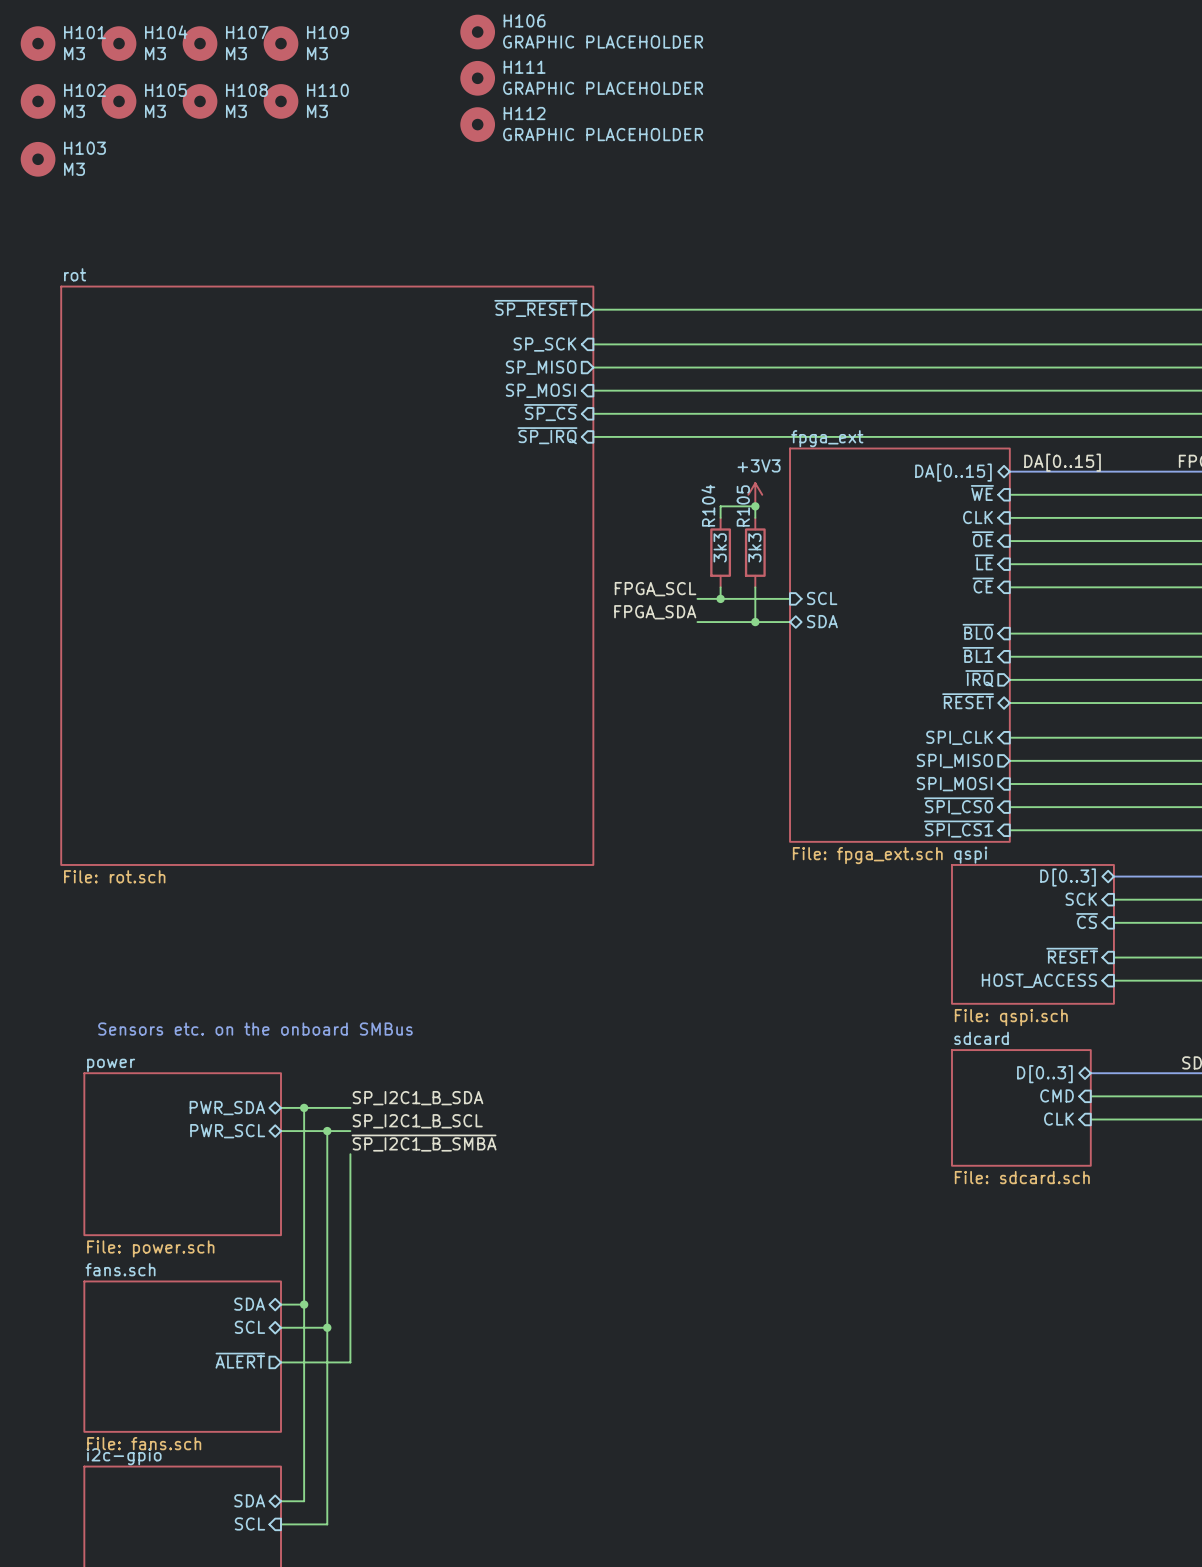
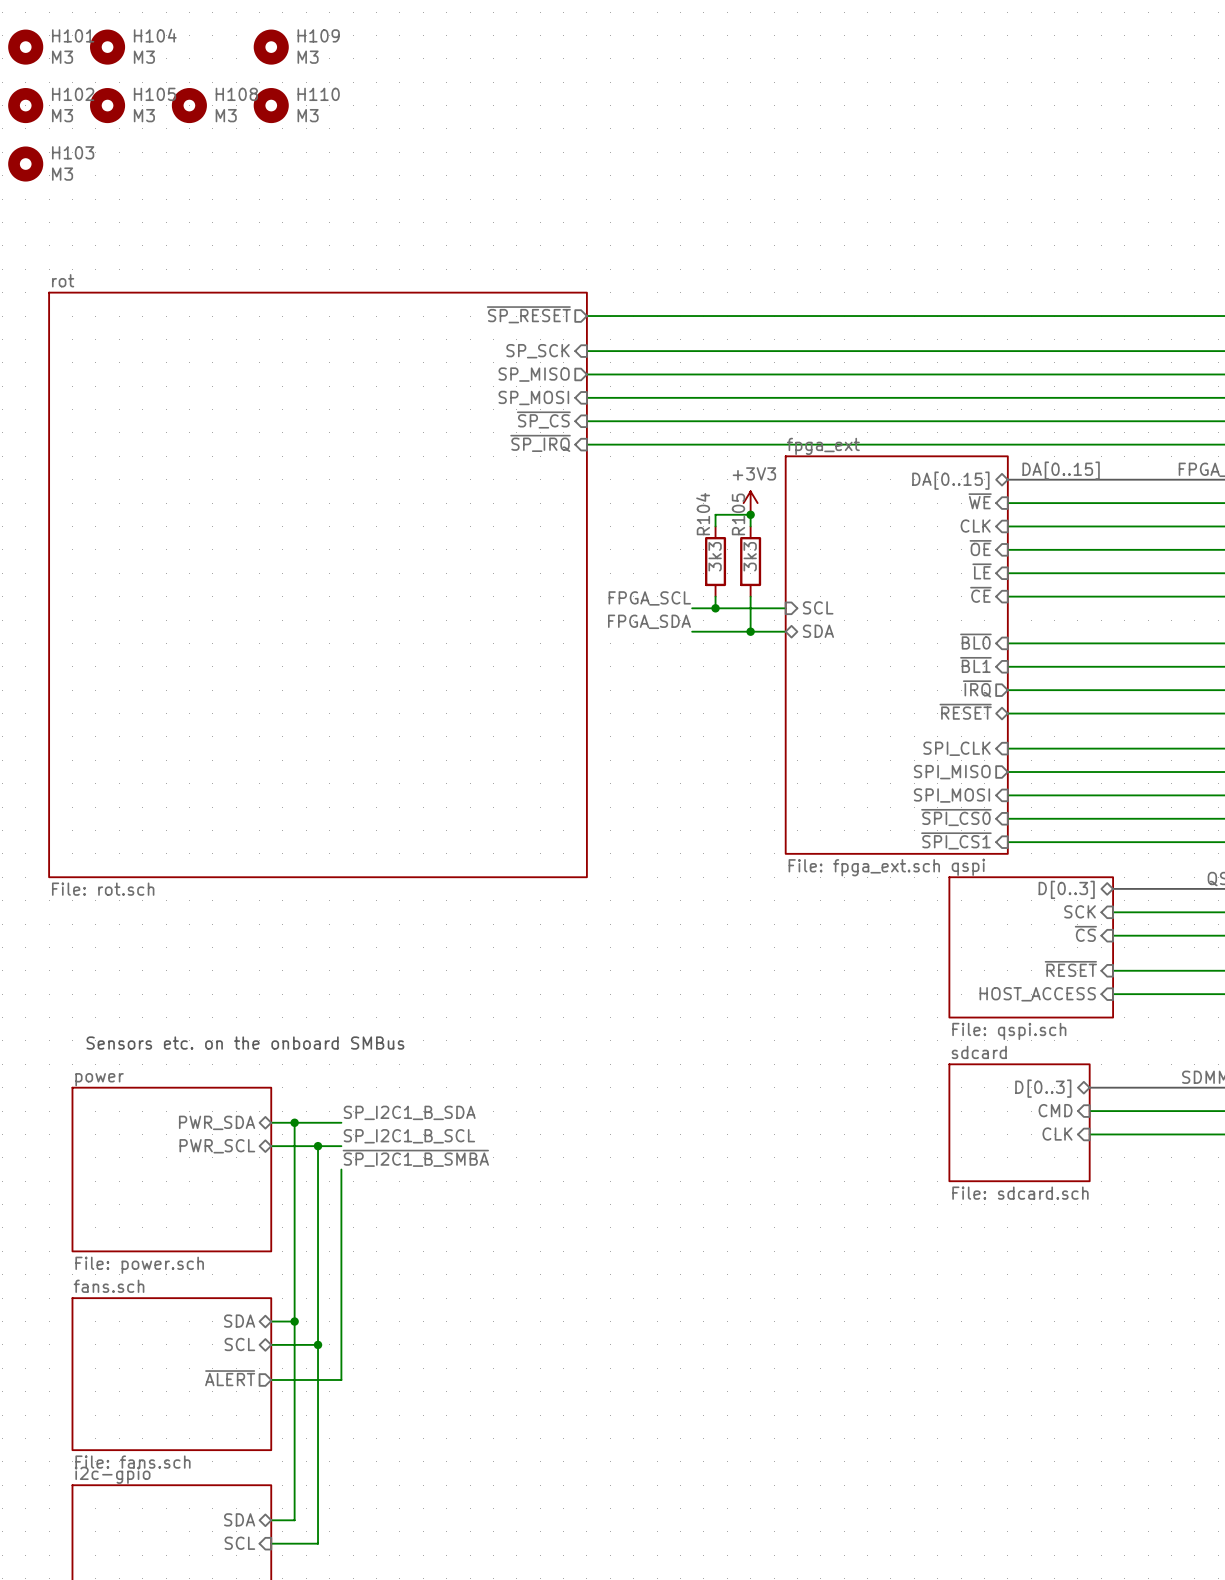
H106: GRAPHIC PLACEHOLDER (477, 32) -> none
H107: M3 (200, 43) -> none
H111: GRAPHIC PLACEHOLDER (477, 78) -> none
H112: GRAPHIC PLACEHOLDER (477, 124) -> none

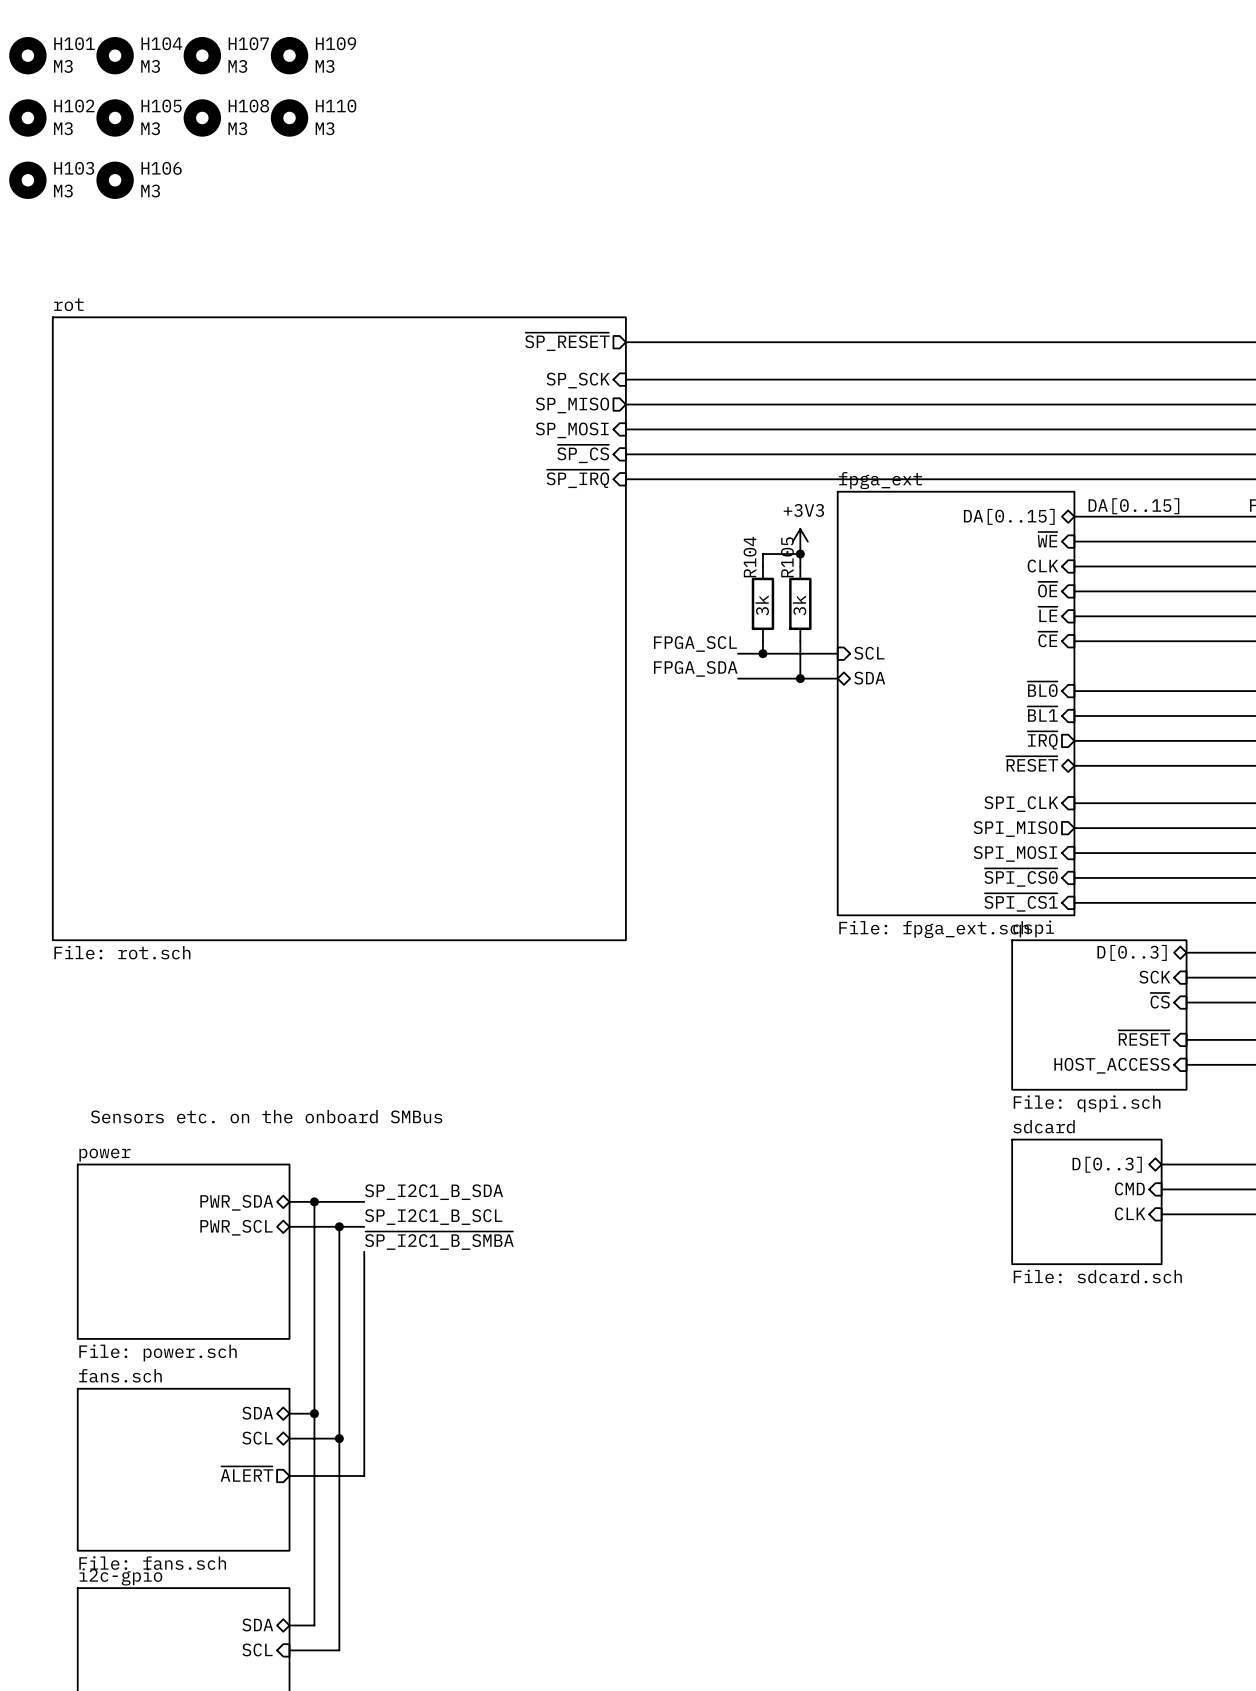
H107: none -> M3 (202, 55)
H106: none -> M3 (115, 180)
R104 value: 3k3 (715, 556) -> 3k (762, 605)
R105 value: 3k3 (750, 556) -> 3k (799, 605)

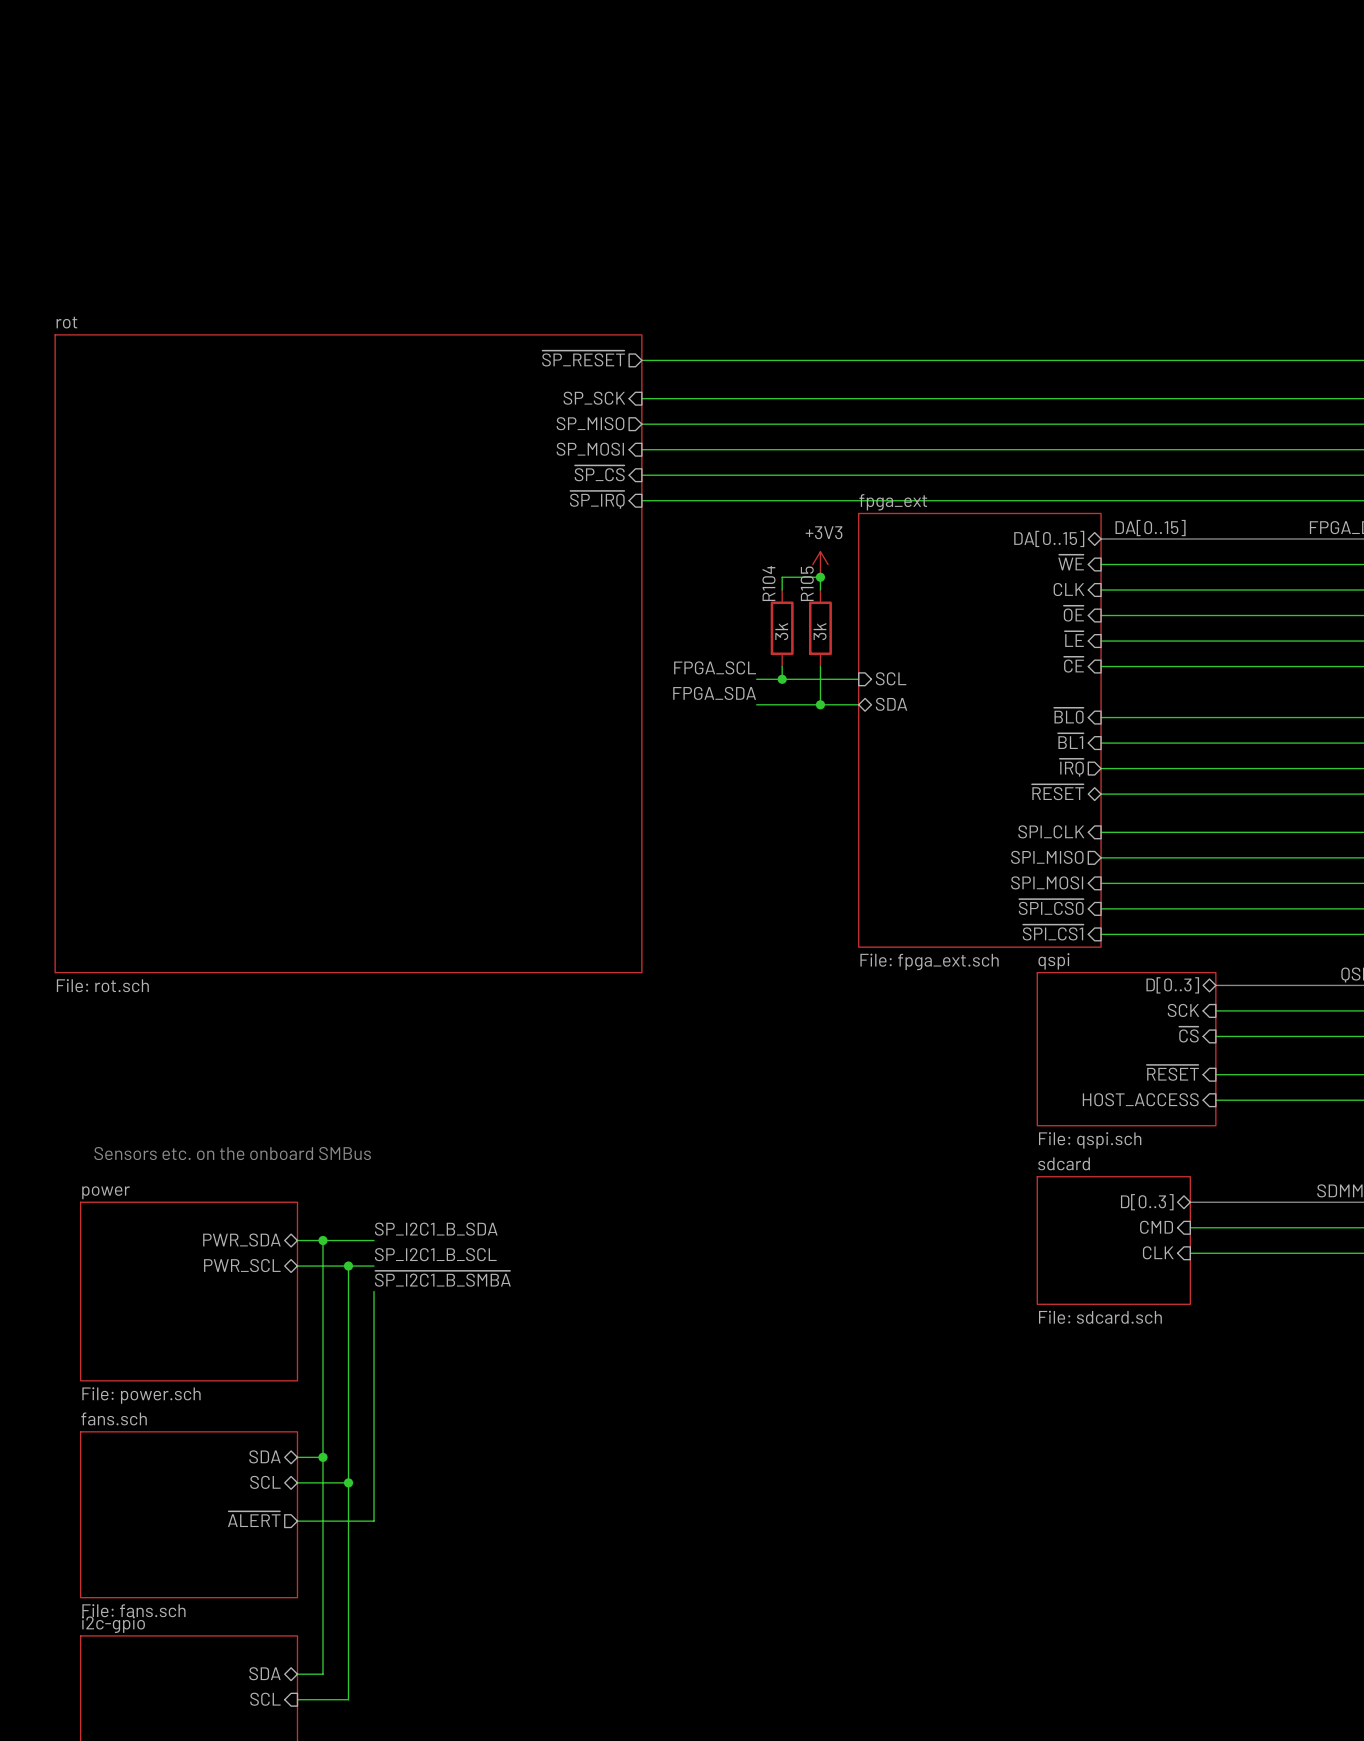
H101: M3 (27, 55) -> none
H104: M3 (115, 55) -> none
H107: M3 (202, 55) -> none
H109: M3 (289, 55) -> none
H102: M3 (27, 117) -> none
H105: M3 (115, 117) -> none
H108: M3 (202, 117) -> none
H110: M3 (289, 117) -> none
H103: M3 (27, 180) -> none
H106: M3 (115, 180) -> none

